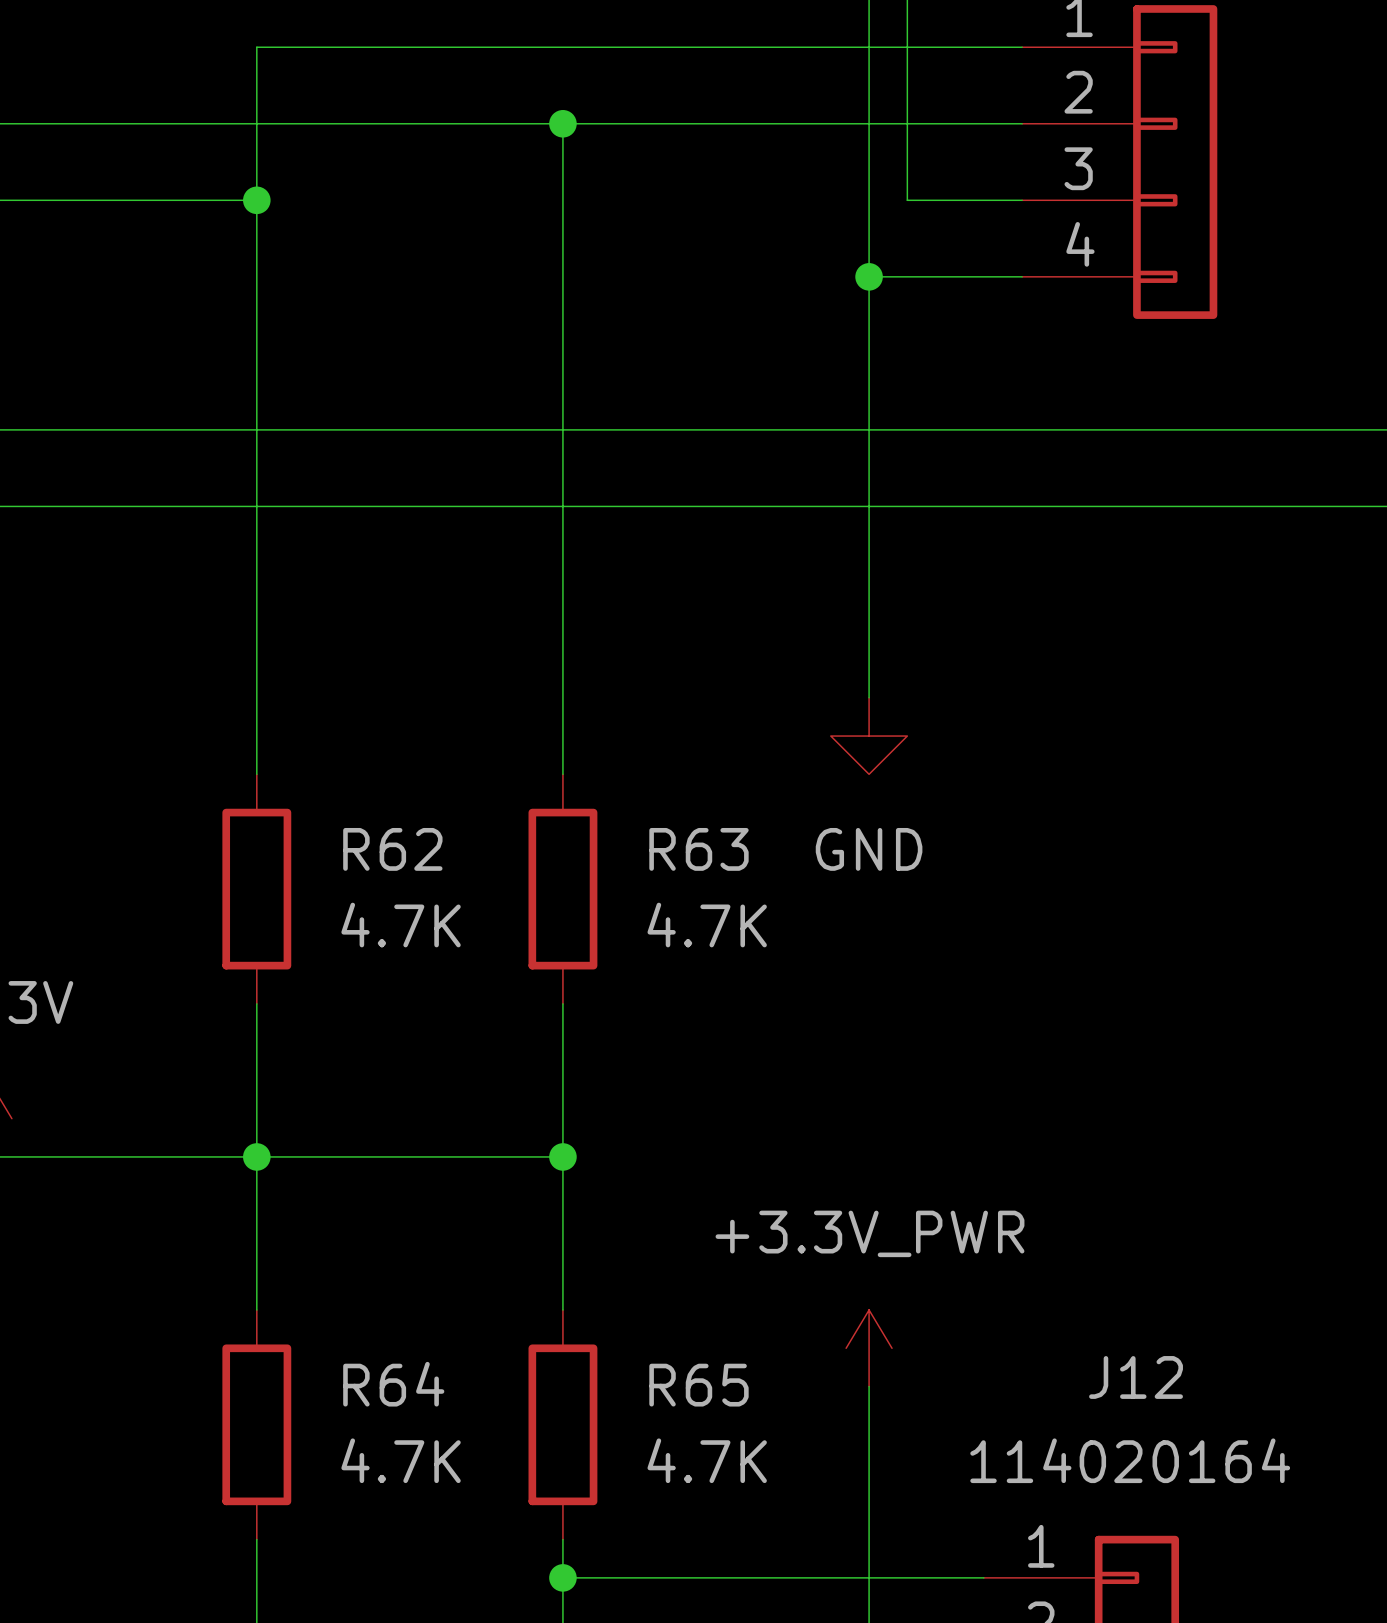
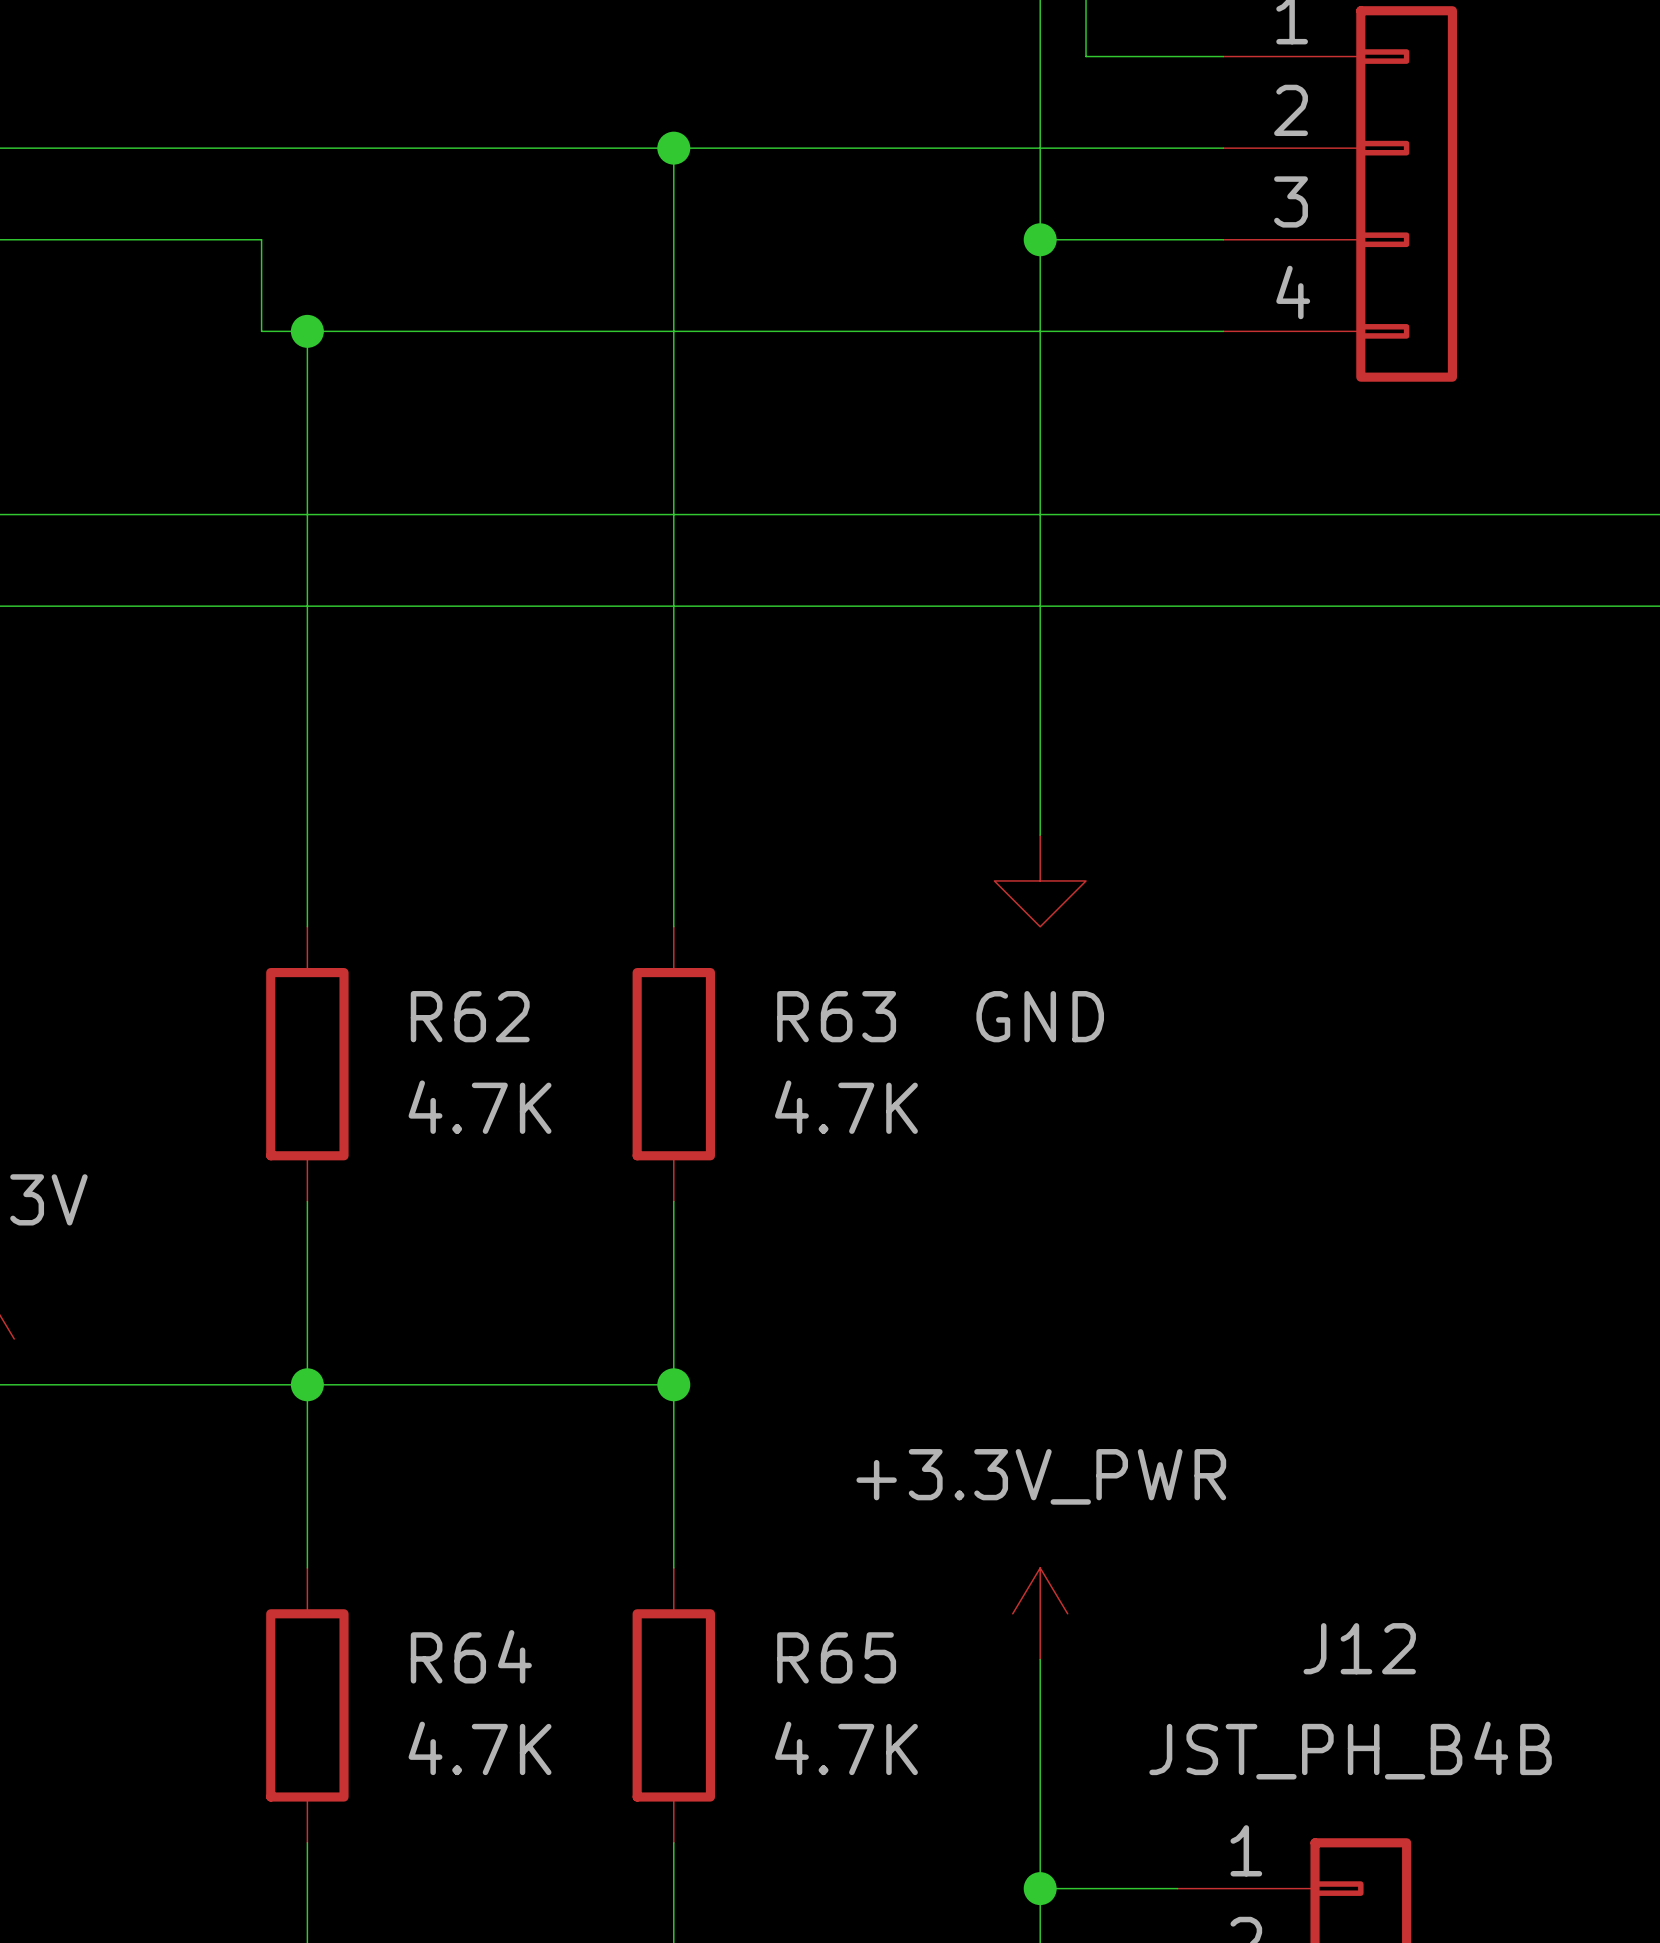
wire: (218, 200) (256, 200) -> (261, 239) (261, 331) (1040, 331)
junction position: (256, 200) -> (307, 331)
wire: (907, 200) (907, 47) (256, 47) (256, 276) -> (1086, 239) (1040, 239)
junction position: (869, 276) -> (1040, 239)
J12 value: 114020164 (1130, 1460) -> JST_PH_B4B (1350, 1750)
wire: (562, 1577) (869, 1577) -> none
junction: (562, 1577) -> none
junction: none -> (1040, 1888)

